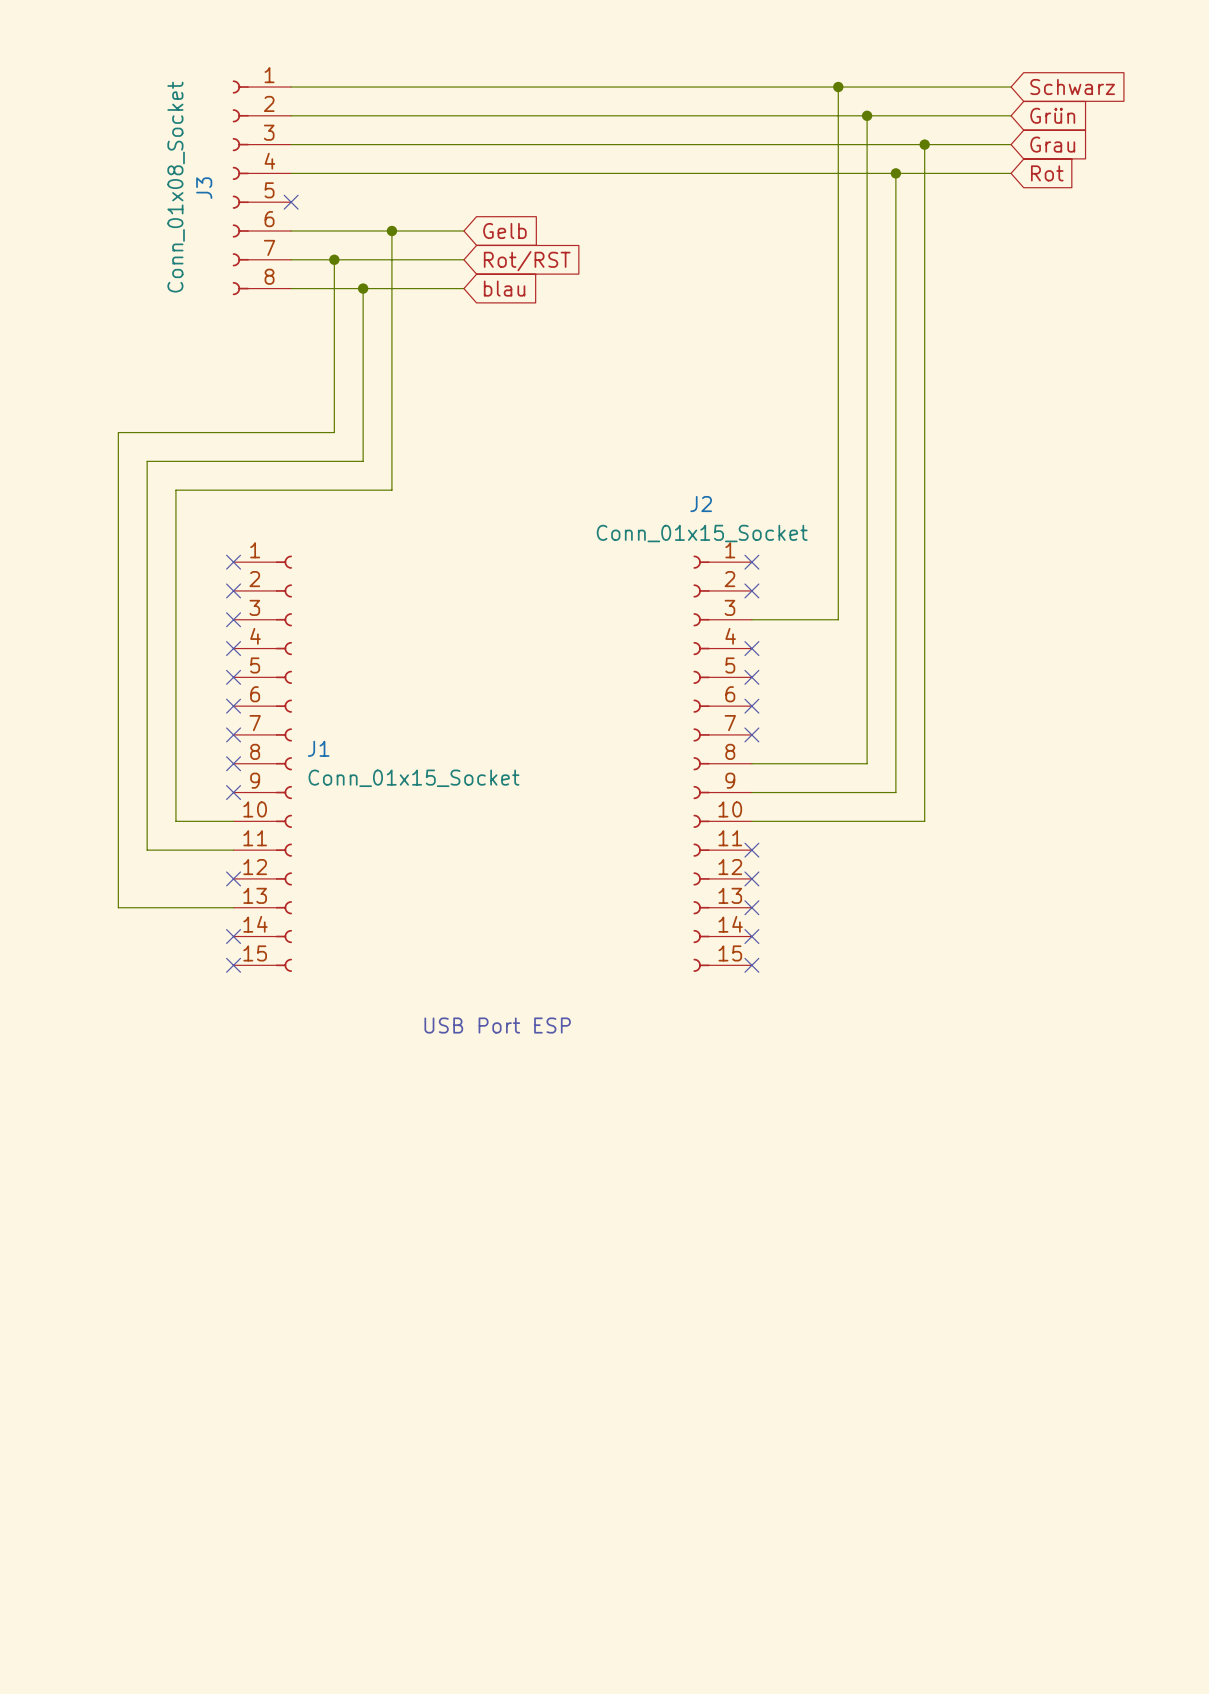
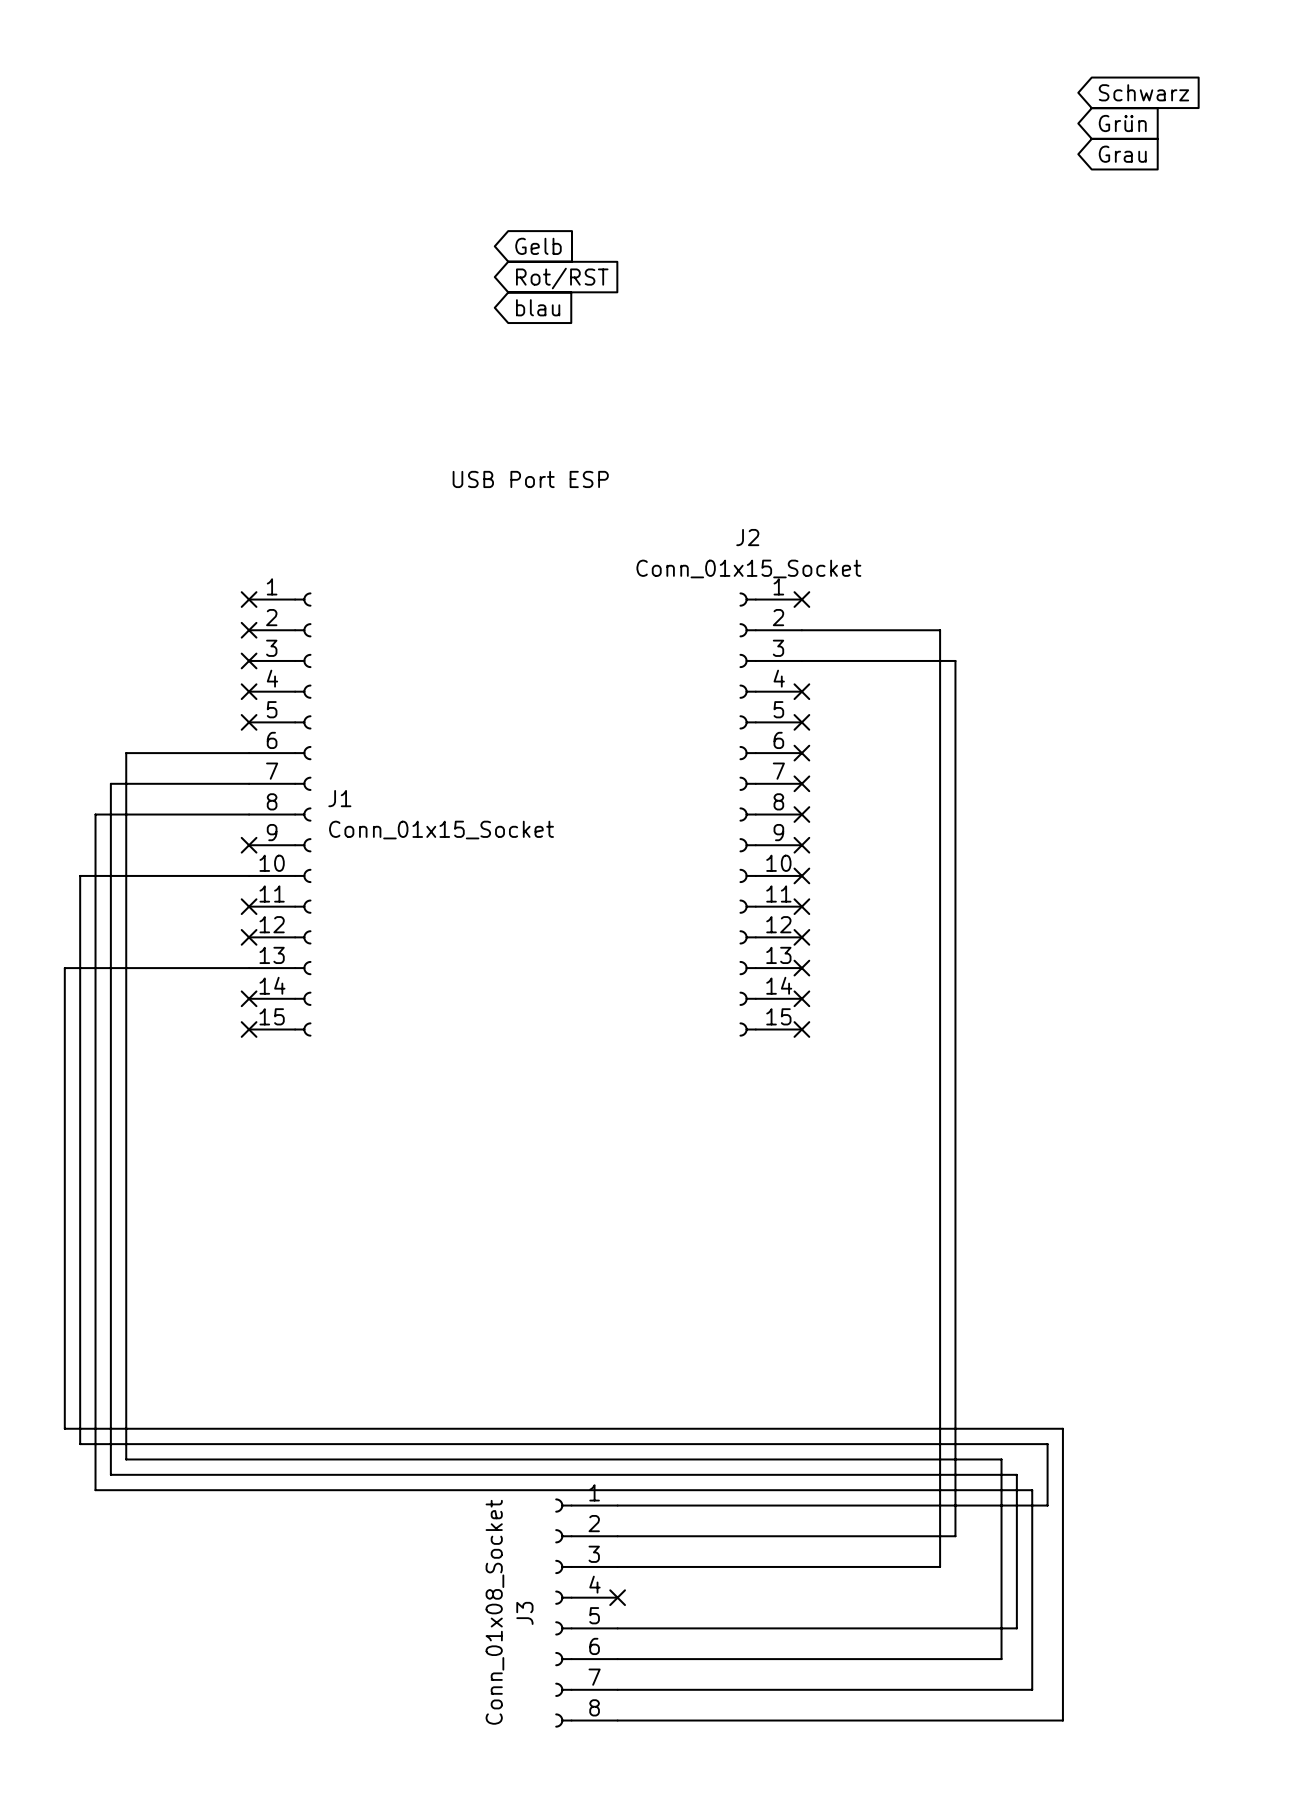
wire: (291, 87) (1011, 87) -> none
wire: (838, 87) (838, 619) -> none
junction: (838, 87) -> none
wire: (291, 115) (1011, 115) -> none
wire: (867, 115) (867, 763) (751, 763) -> none
junction: (867, 115) -> none
wire: (291, 144) (1011, 144) -> none
wire: (924, 144) (924, 821) (751, 821) -> none
junction: (924, 144) -> none
wire: (291, 173) (1011, 173) -> none
wire: (895, 173) (895, 619) -> (894, 660) (955, 660)
junction: (895, 173) -> none
global label: Rot (1047, 173) -> none
J3 position: (261, 187) -> (586, 1613)
no-connect mark: (291, 202) -> none
wire: (291, 230) (463, 230) -> none
wire: (391, 230) (391, 490) (175, 490) (175, 821) -> (617, 1505) (1047, 1505) (1047, 1444) (80, 1444) (80, 875) (187, 875)
junction: (391, 230) -> none
wire: (291, 259) (463, 259) -> none
wire: (334, 259) (334, 432) (118, 432) (118, 706) -> (249, 753) (126, 753)
junction: (334, 259) -> none
wire: (291, 288) (463, 288) -> none
wire: (363, 288) (363, 461) (147, 461) (147, 850) (233, 850) -> none
junction: (363, 288) -> none
text: none -> USB Port ESP (530, 479)
wire: none -> (801, 630) (940, 630) (940, 1566) (617, 1566)
no-connect mark: (751, 590) -> none
no-connect mark: (233, 706) -> none
wire: none -> (249, 783) (110, 783) (110, 1474) (1016, 1474) (1016, 1628) (617, 1628)
no-connect mark: (233, 734) -> none
wire: none -> (249, 814) (95, 814) (95, 1490) (1032, 1490) (1032, 1689) (617, 1689)
no-connect mark: (233, 763) -> none
no-connect mark: none -> (801, 814)
wire: (751, 792) (895, 792) -> (617, 1536) (955, 1536) (955, 845)
no-connect mark: none -> (801, 845)
no-connect mark: none -> (801, 875)
no-connect mark: none -> (249, 906)
text: USB Port ESP (497, 1025) -> none
no-connect mark: none -> (617, 1597)
wire: none -> (617, 1659) (1001, 1659) (1001, 1459) (126, 1459) (126, 968) (64, 968) (64, 1428) (1062, 1428) (1062, 1720) (617, 1720)

